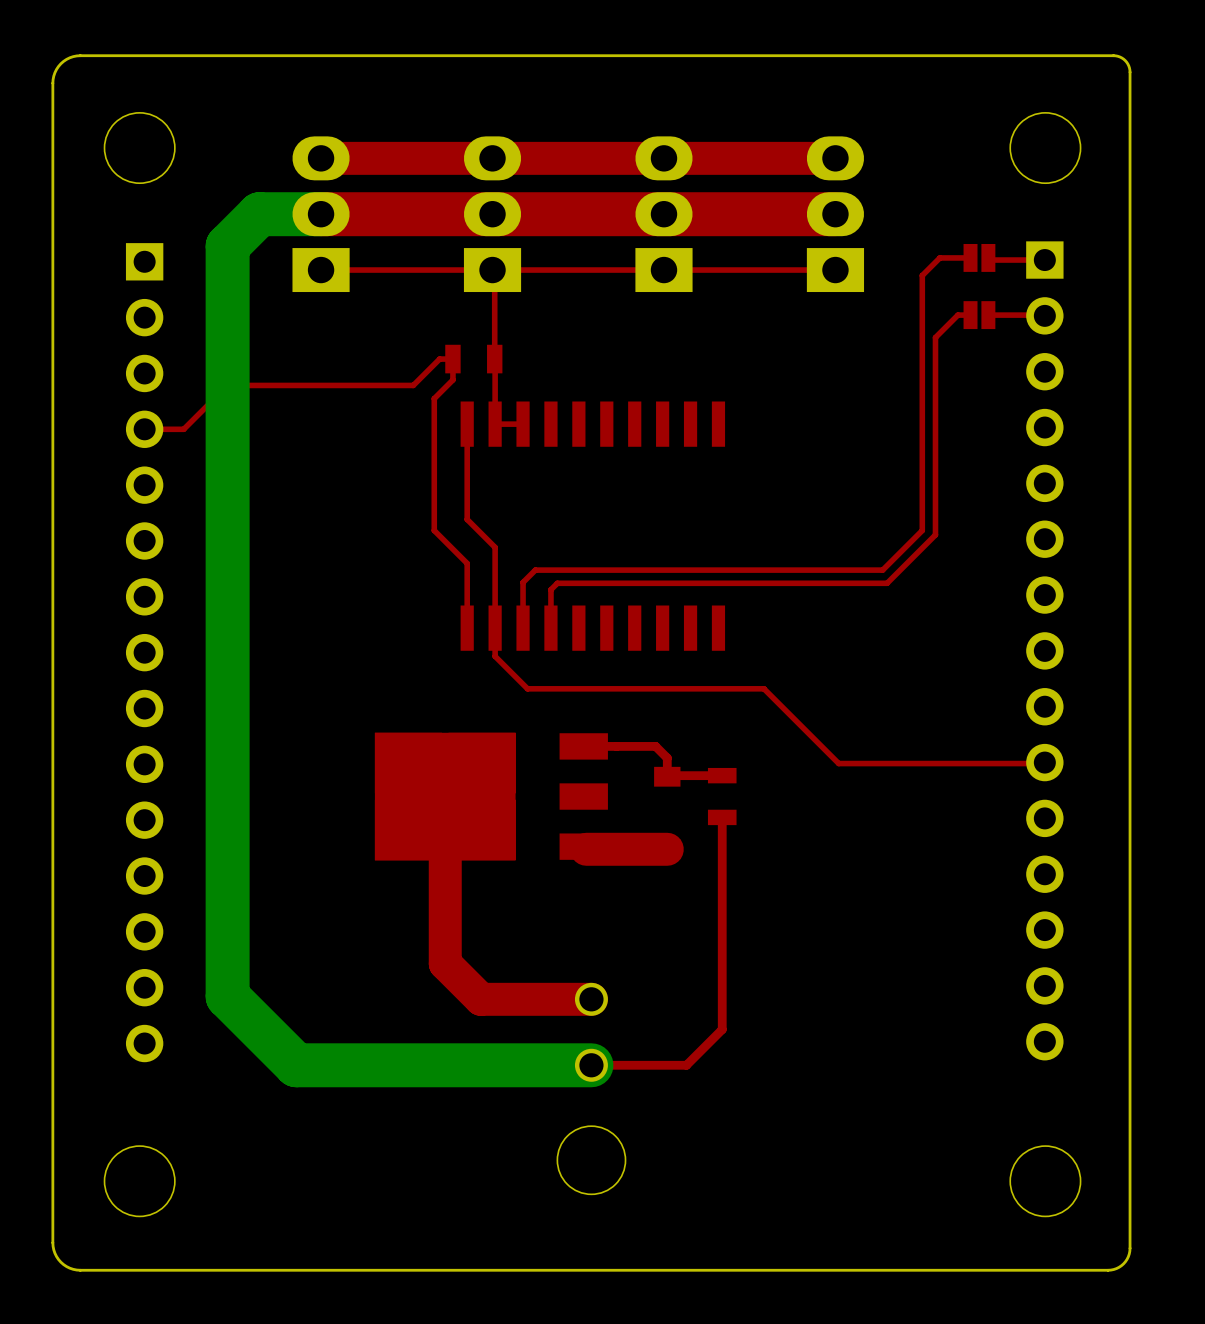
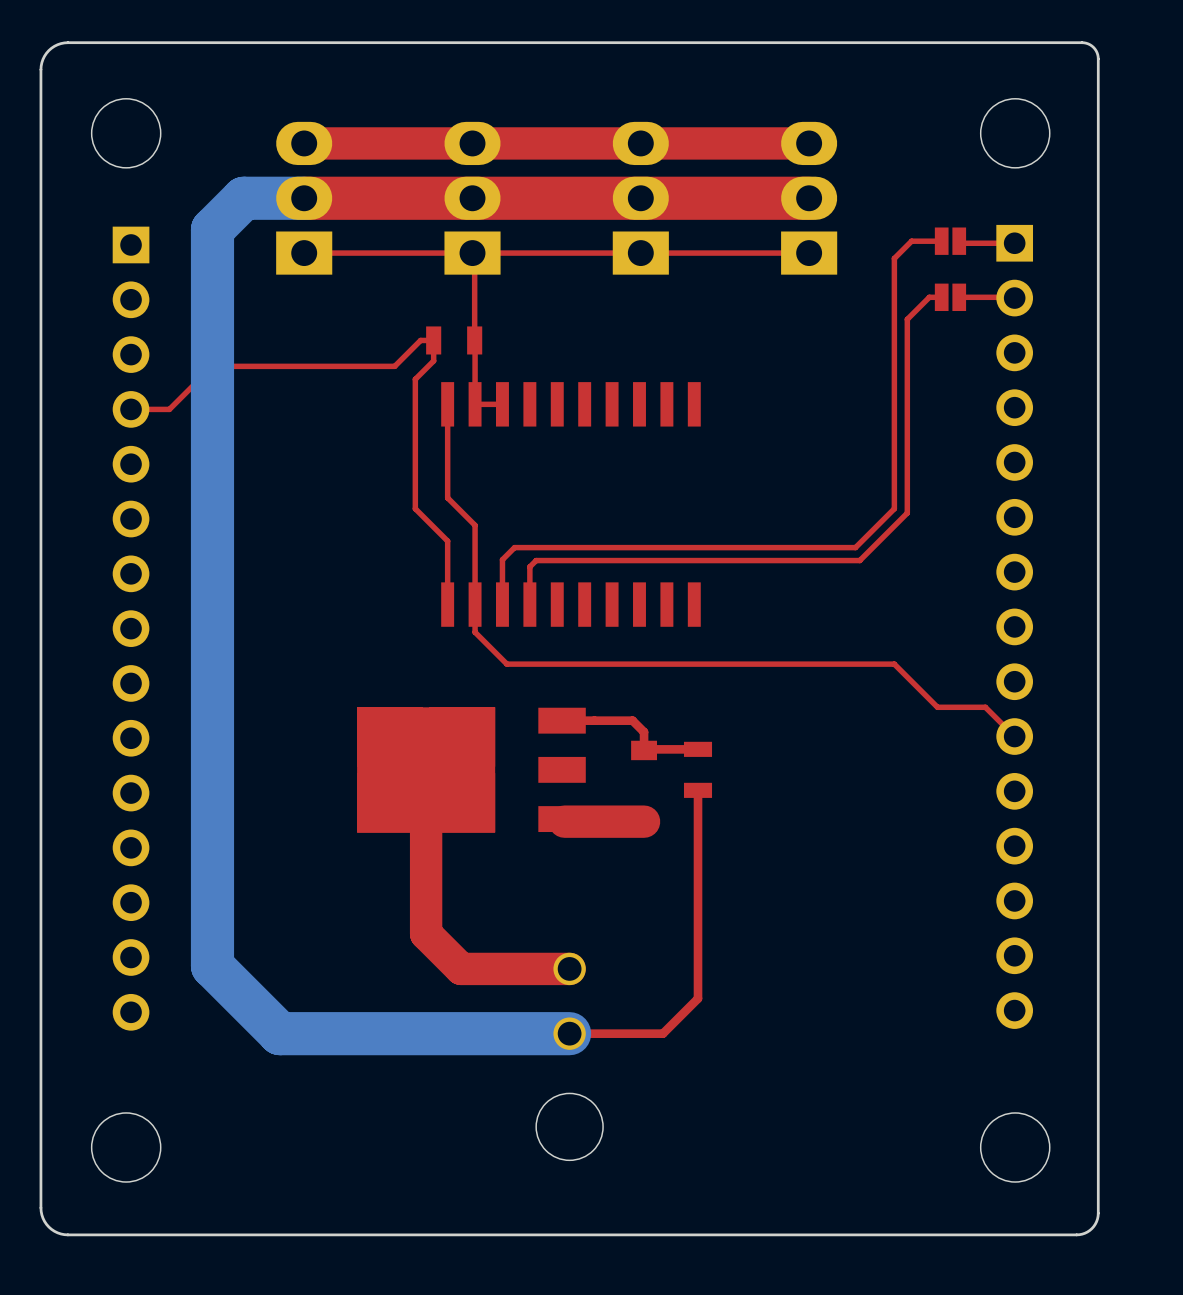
top track: (764, 688) (838, 763) (1044, 762) -> (739, 664) (894, 664) (937, 707) (985, 707) (1014, 736)

